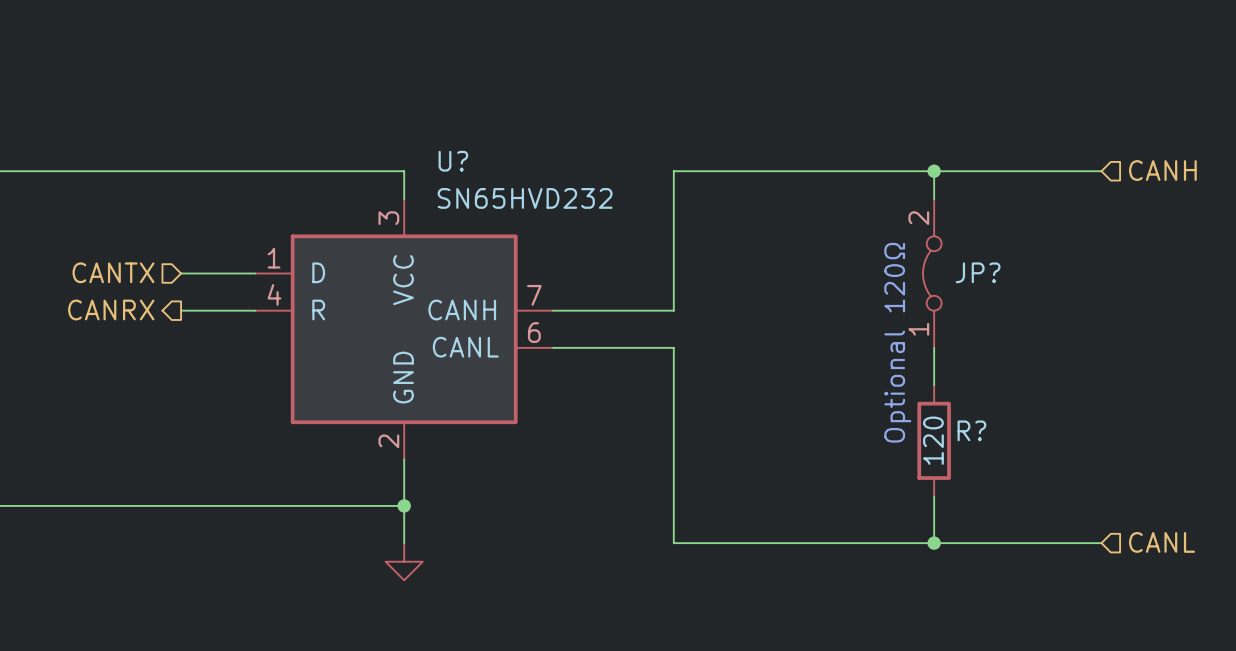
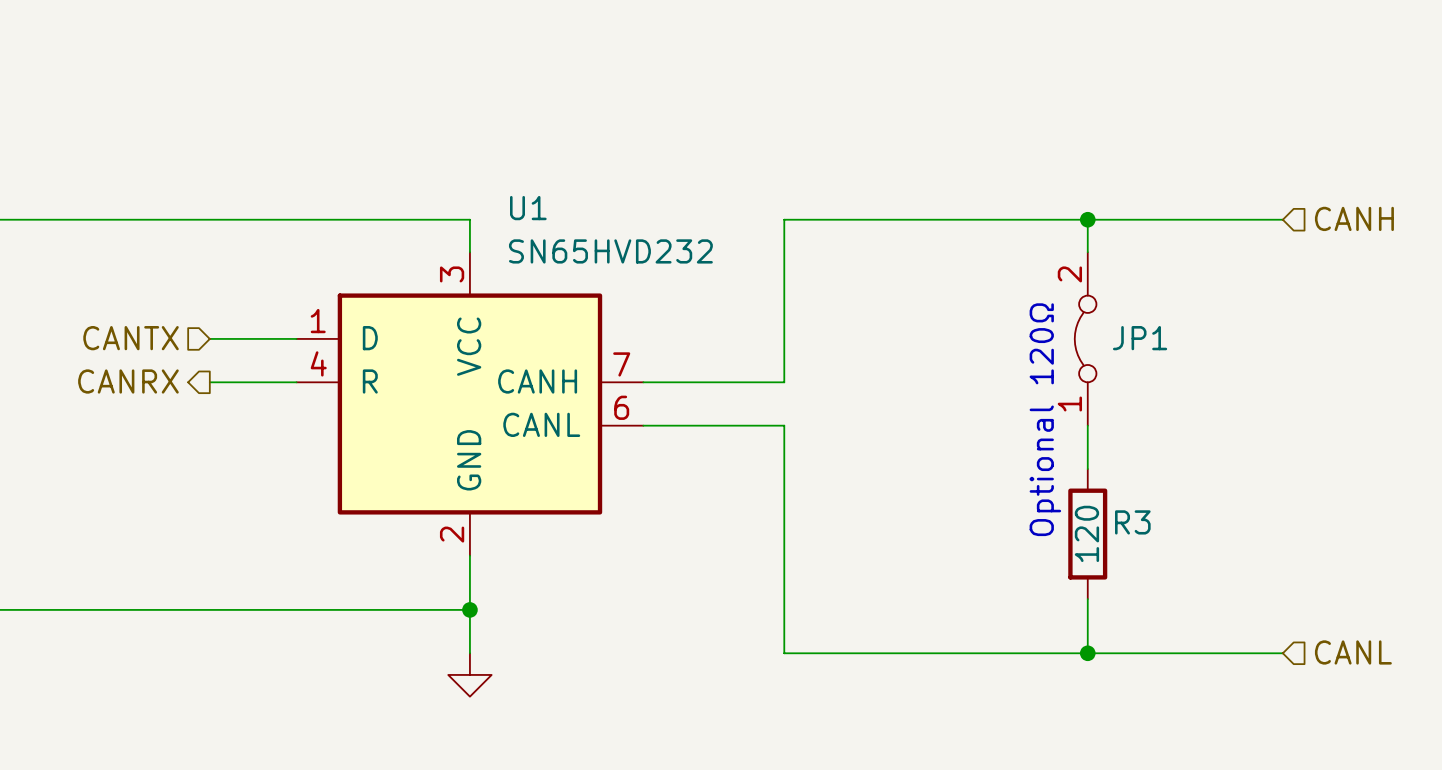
U? name: U? (453, 161) -> U1 (528, 208)
JP? name: JP? (978, 272) -> JP1 (1140, 338)
R? name: R? (971, 430) -> R3 (1132, 522)

